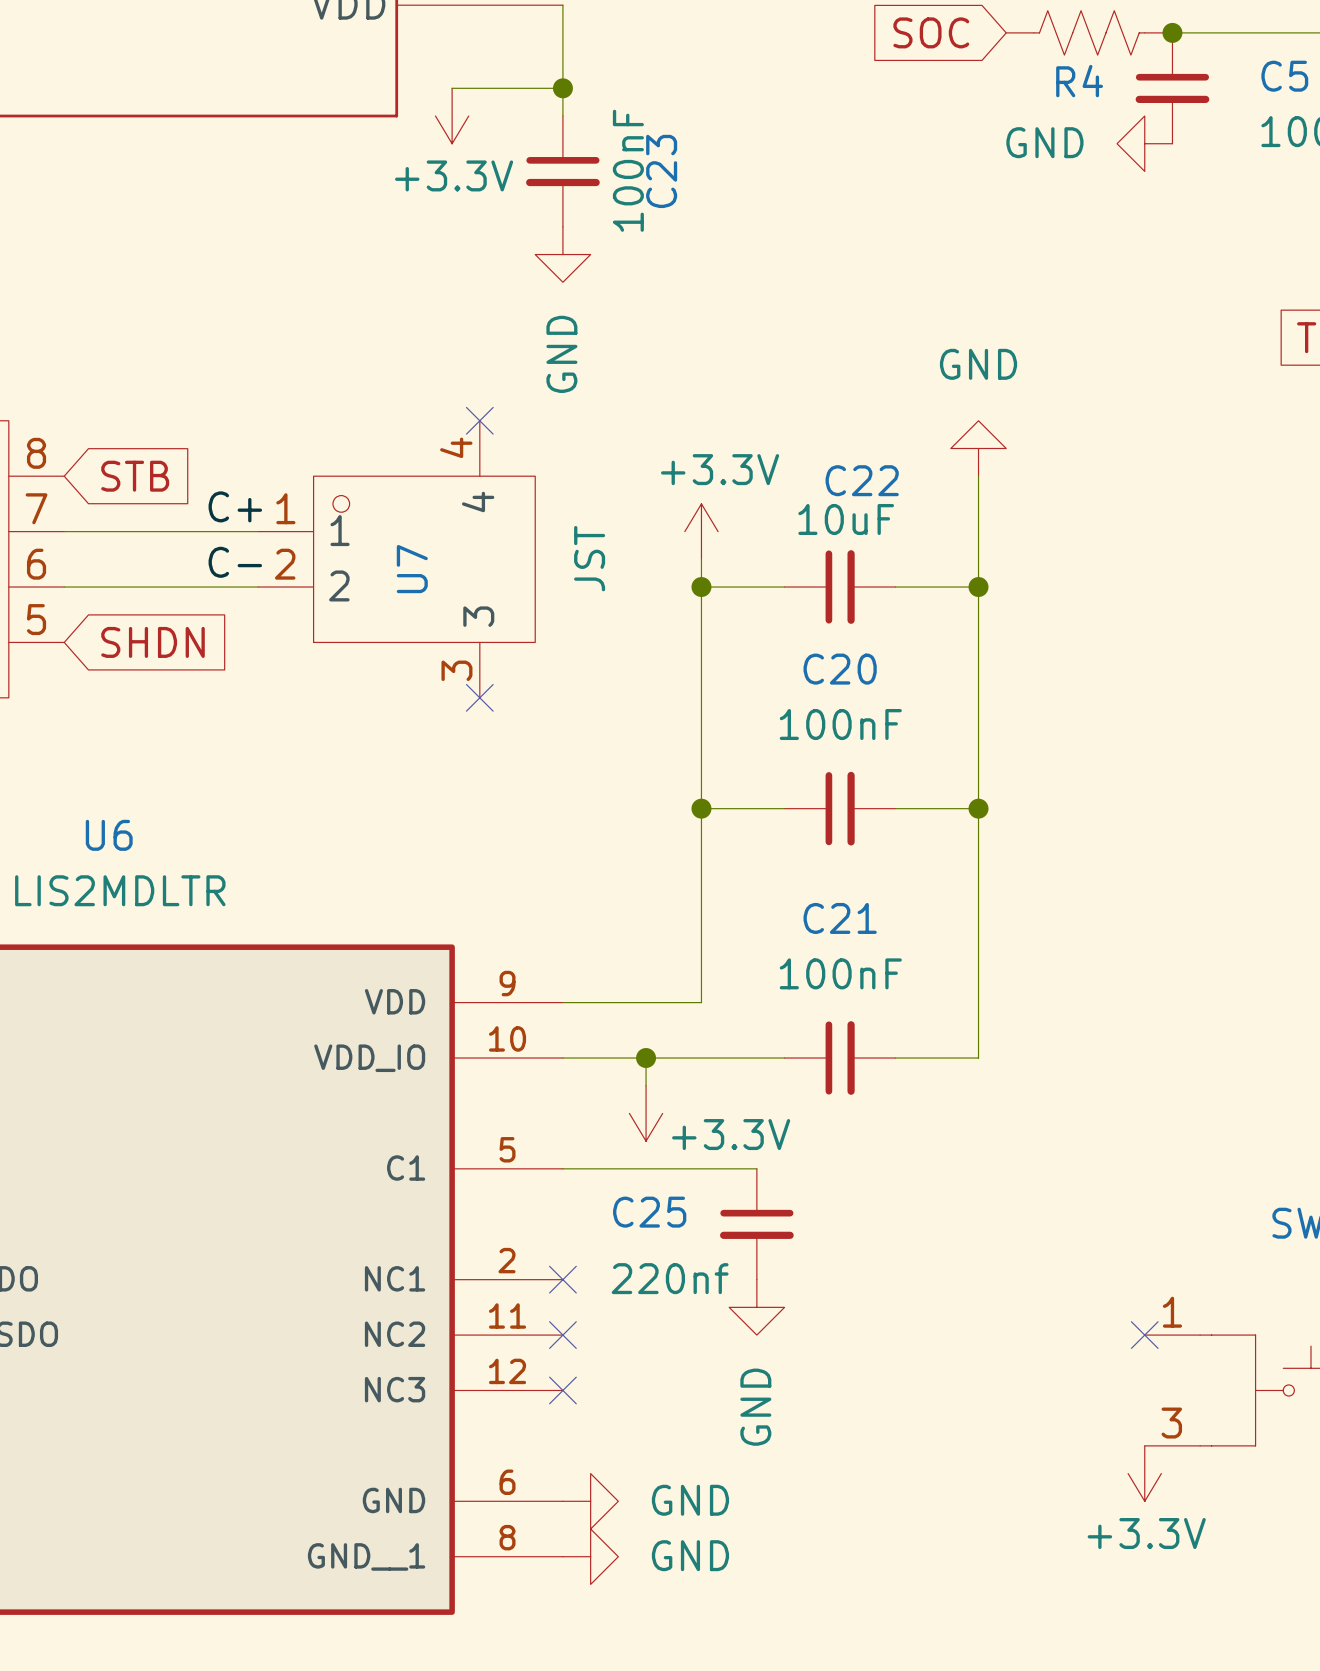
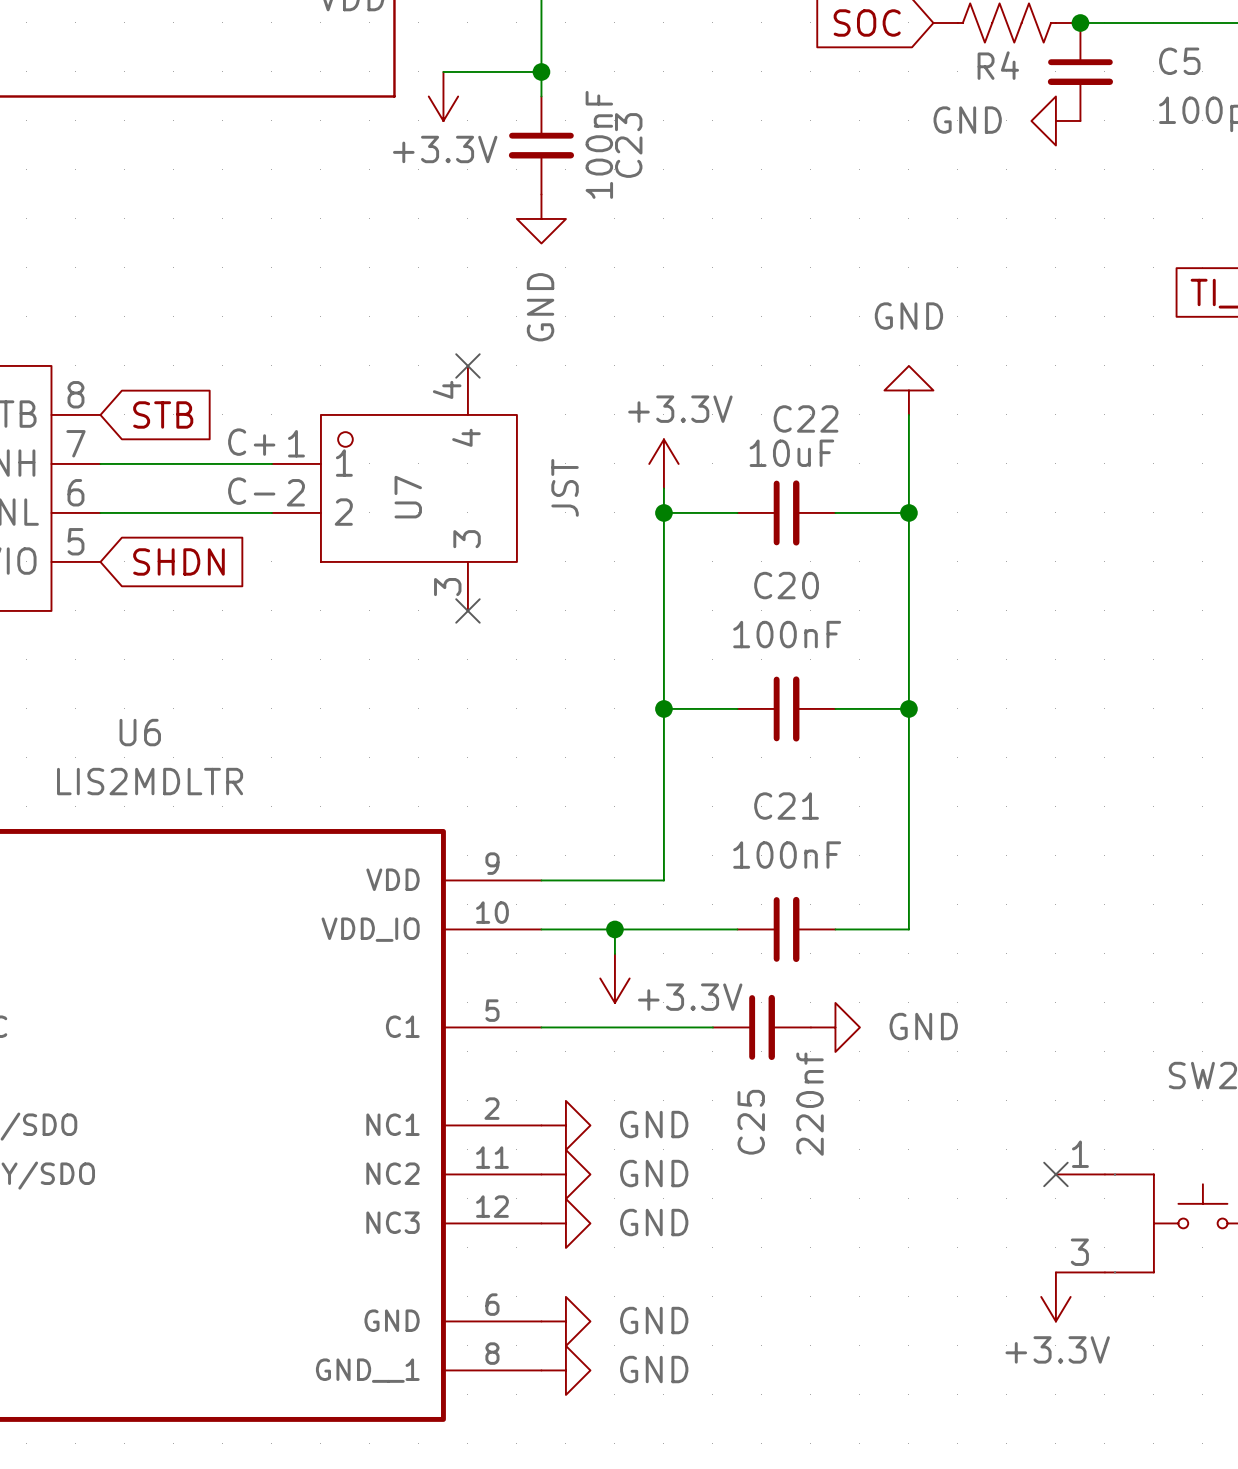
power symbol: none -> GND (835, 1027)
C25 rotation: 0° (756, 1224) -> 90° counterclockwise (762, 1027)
C25 position: (756, 1224) -> (761, 1027)
no-connect mark: (562, 1279) -> none
power symbol: none -> GND (565, 1125)
power symbol: GND (756, 1307) -> none
no-connect mark: (562, 1335) -> none
power symbol: none -> GND (565, 1174)
no-connect mark: (562, 1390) -> none
power symbol: none -> GND (565, 1223)

